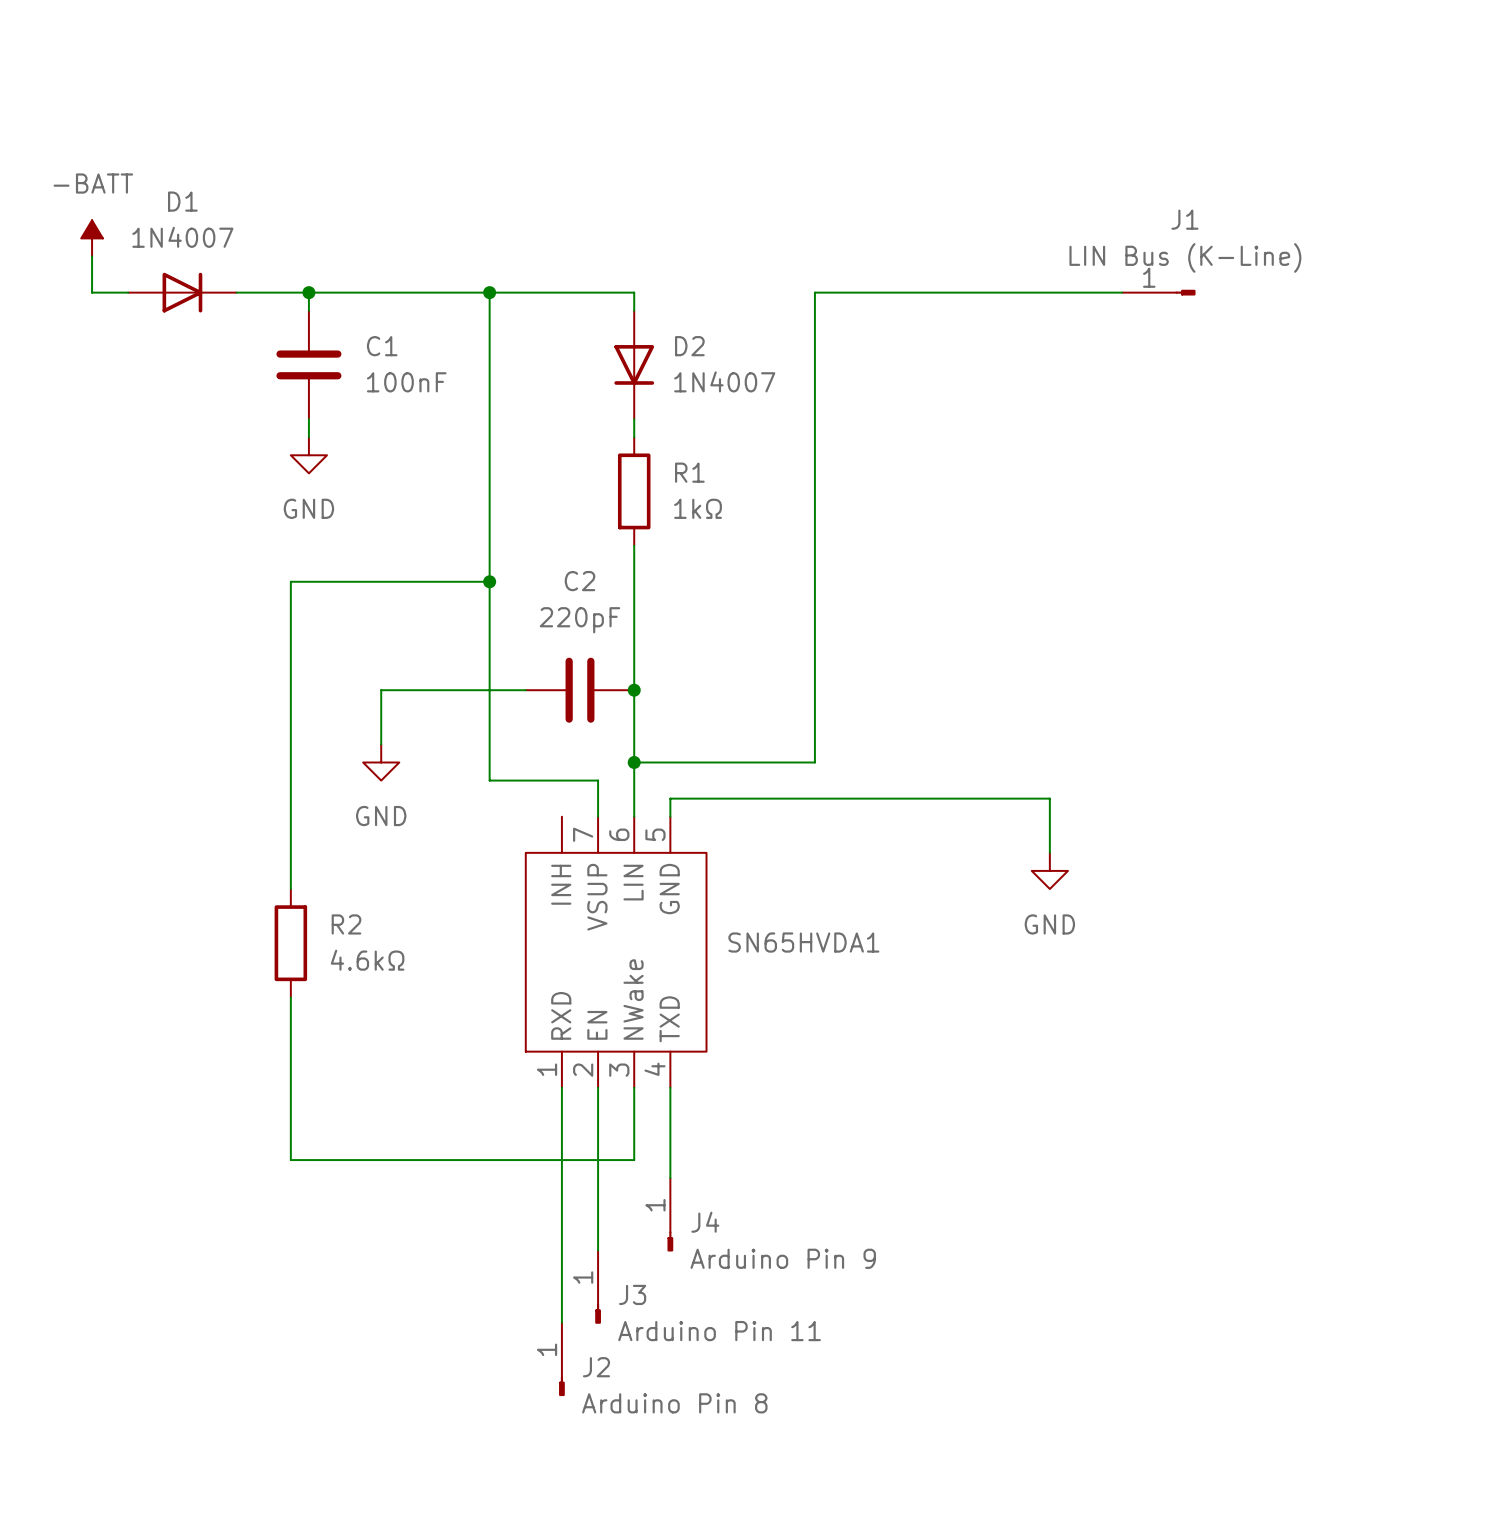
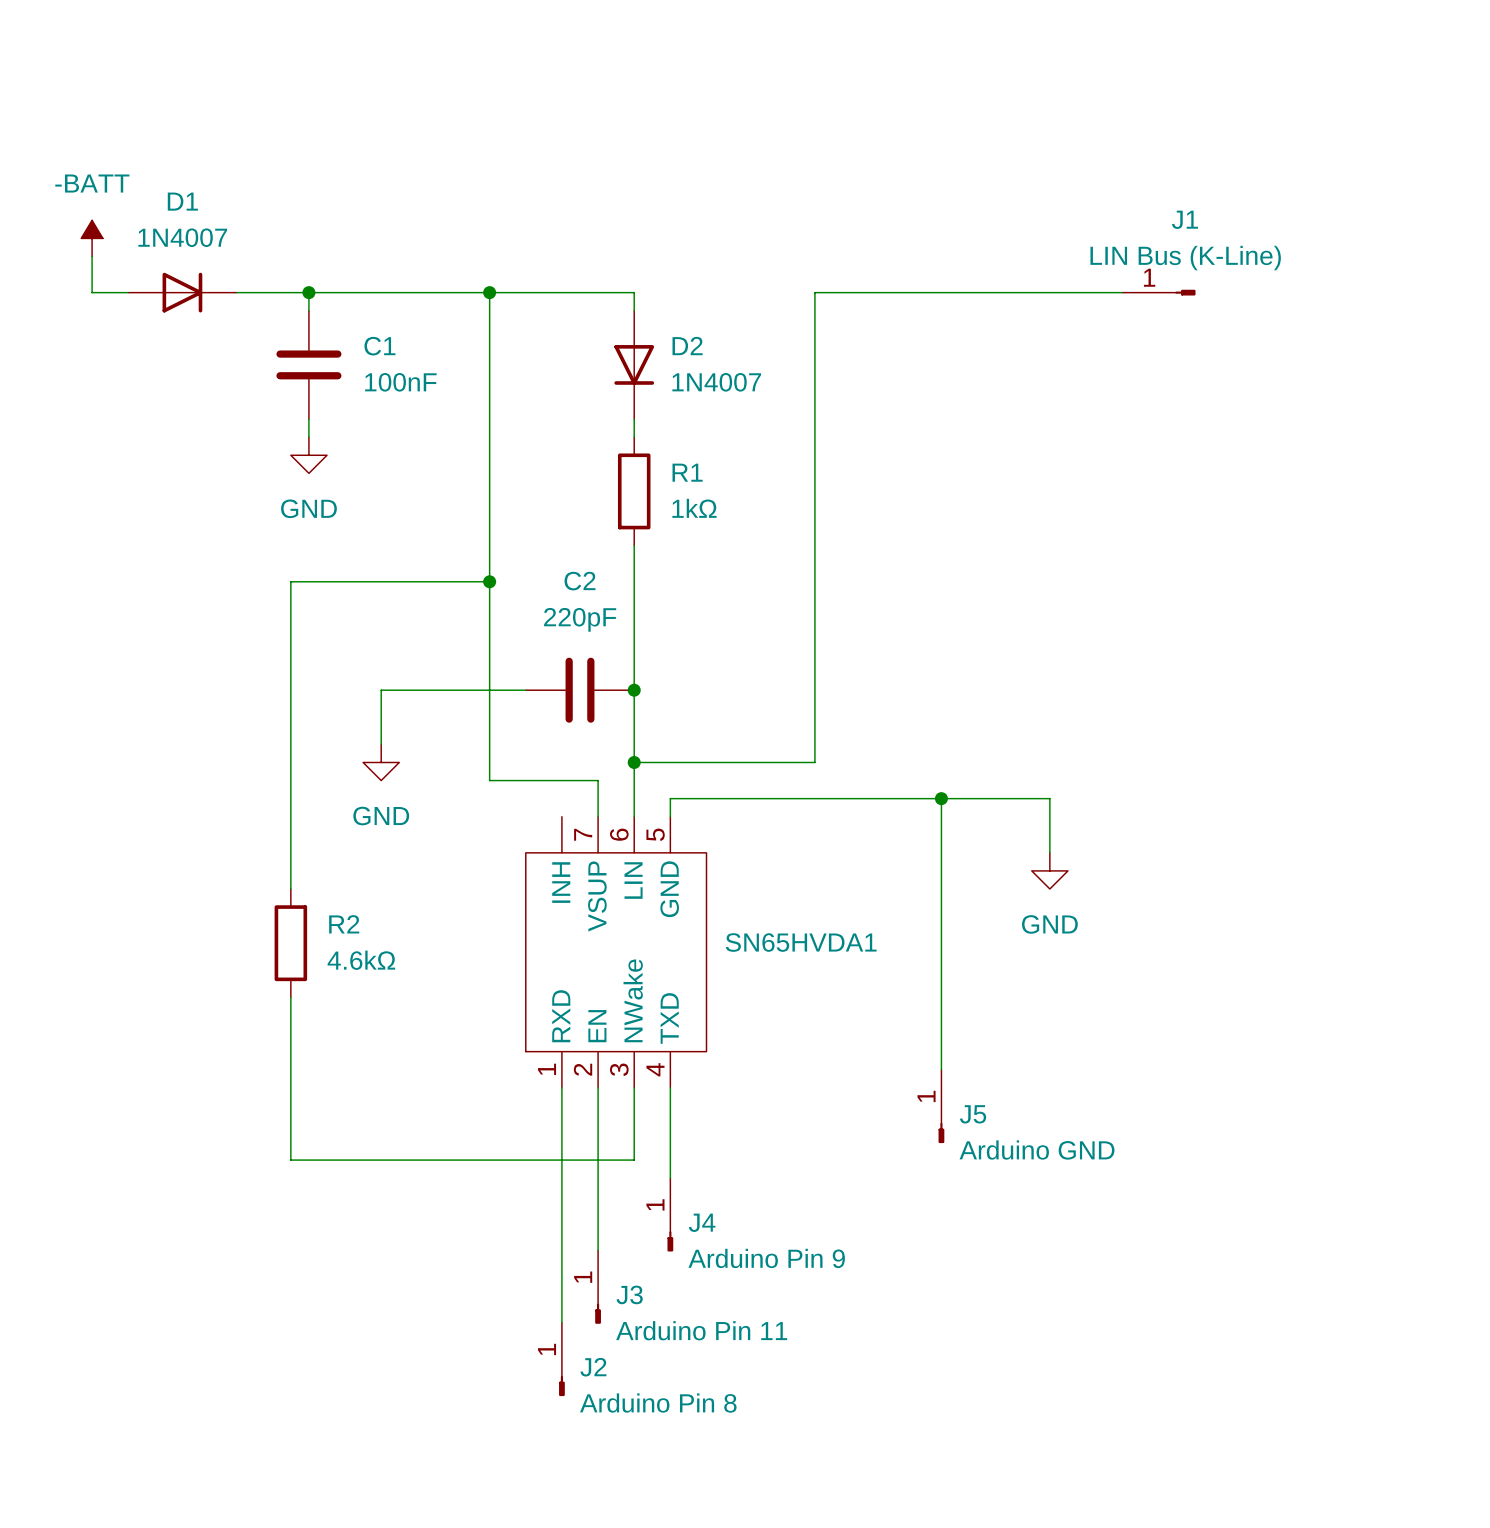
wire: none -> (941, 798) (941, 1069)
junction: none -> (941, 798)
J5: none -> Arduino GND (941, 1106)

